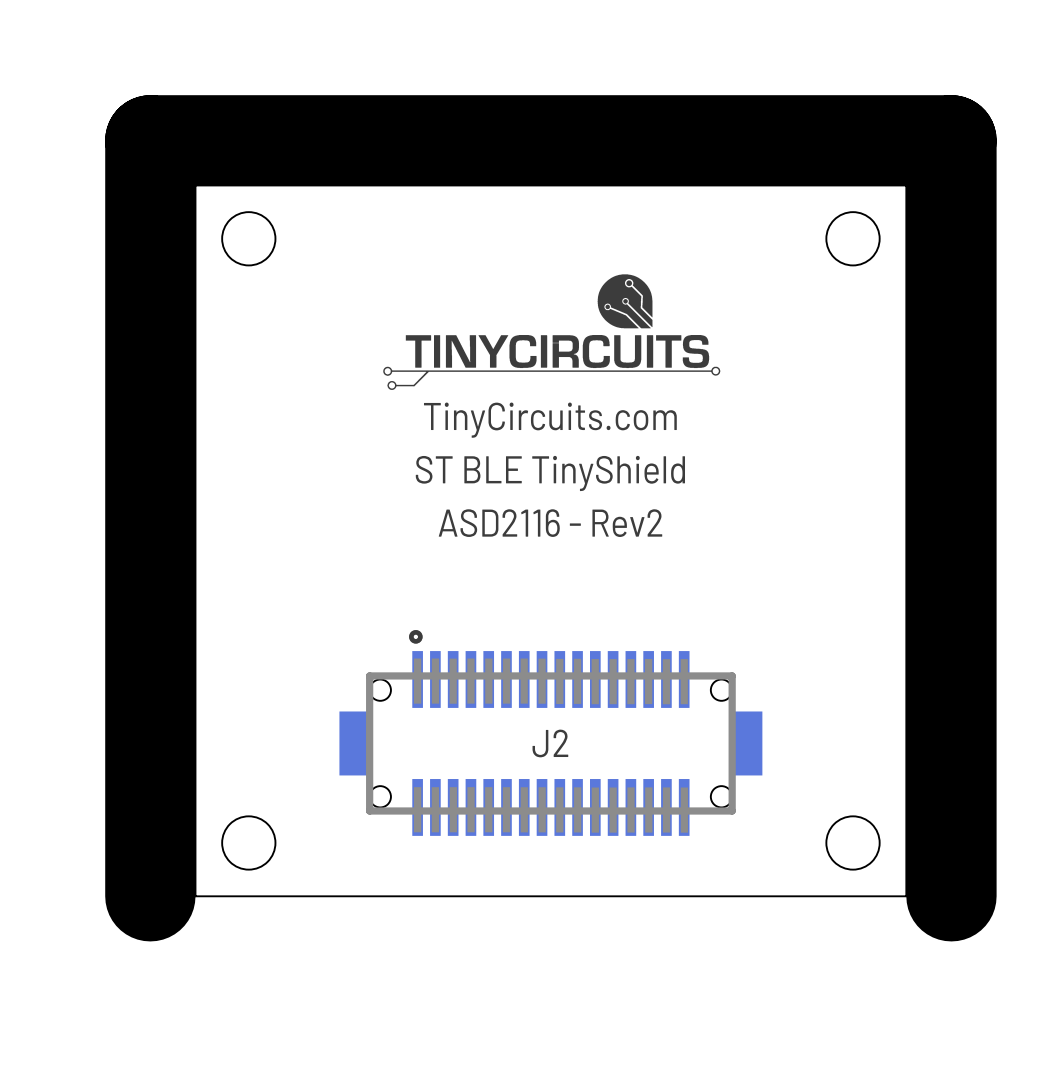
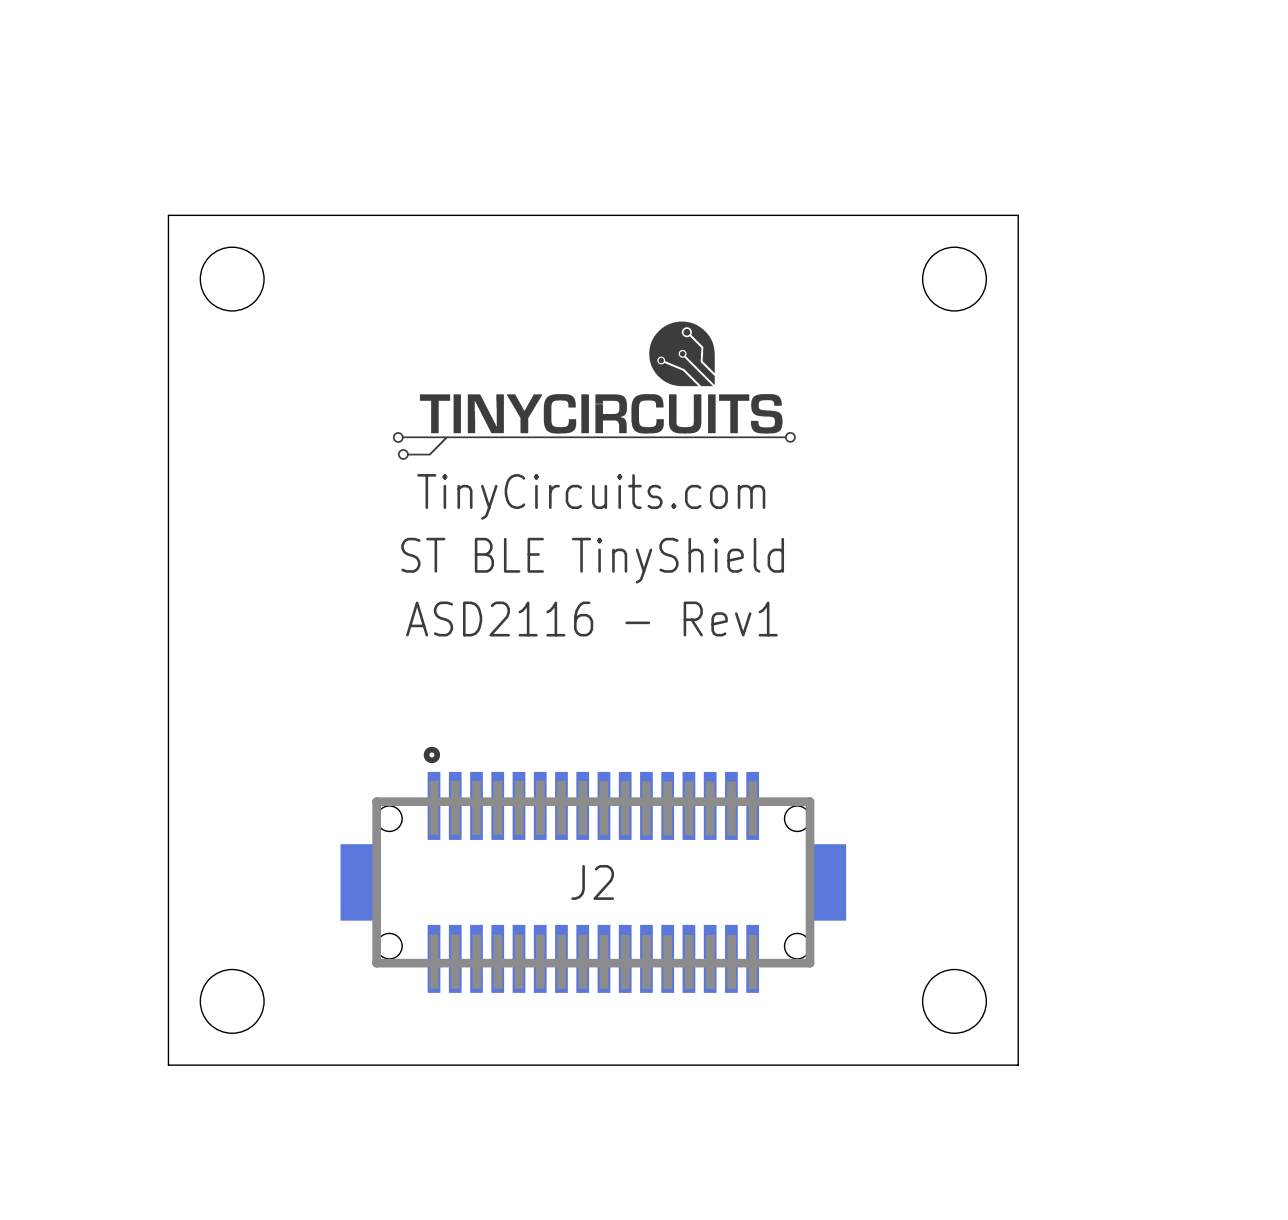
text: ASD2116 - Rev2 (550, 523) -> ASD2116 - Rev1 (591, 618)
board edge: (951, 896) (951, 140) (150, 140) (150, 896) -> none

